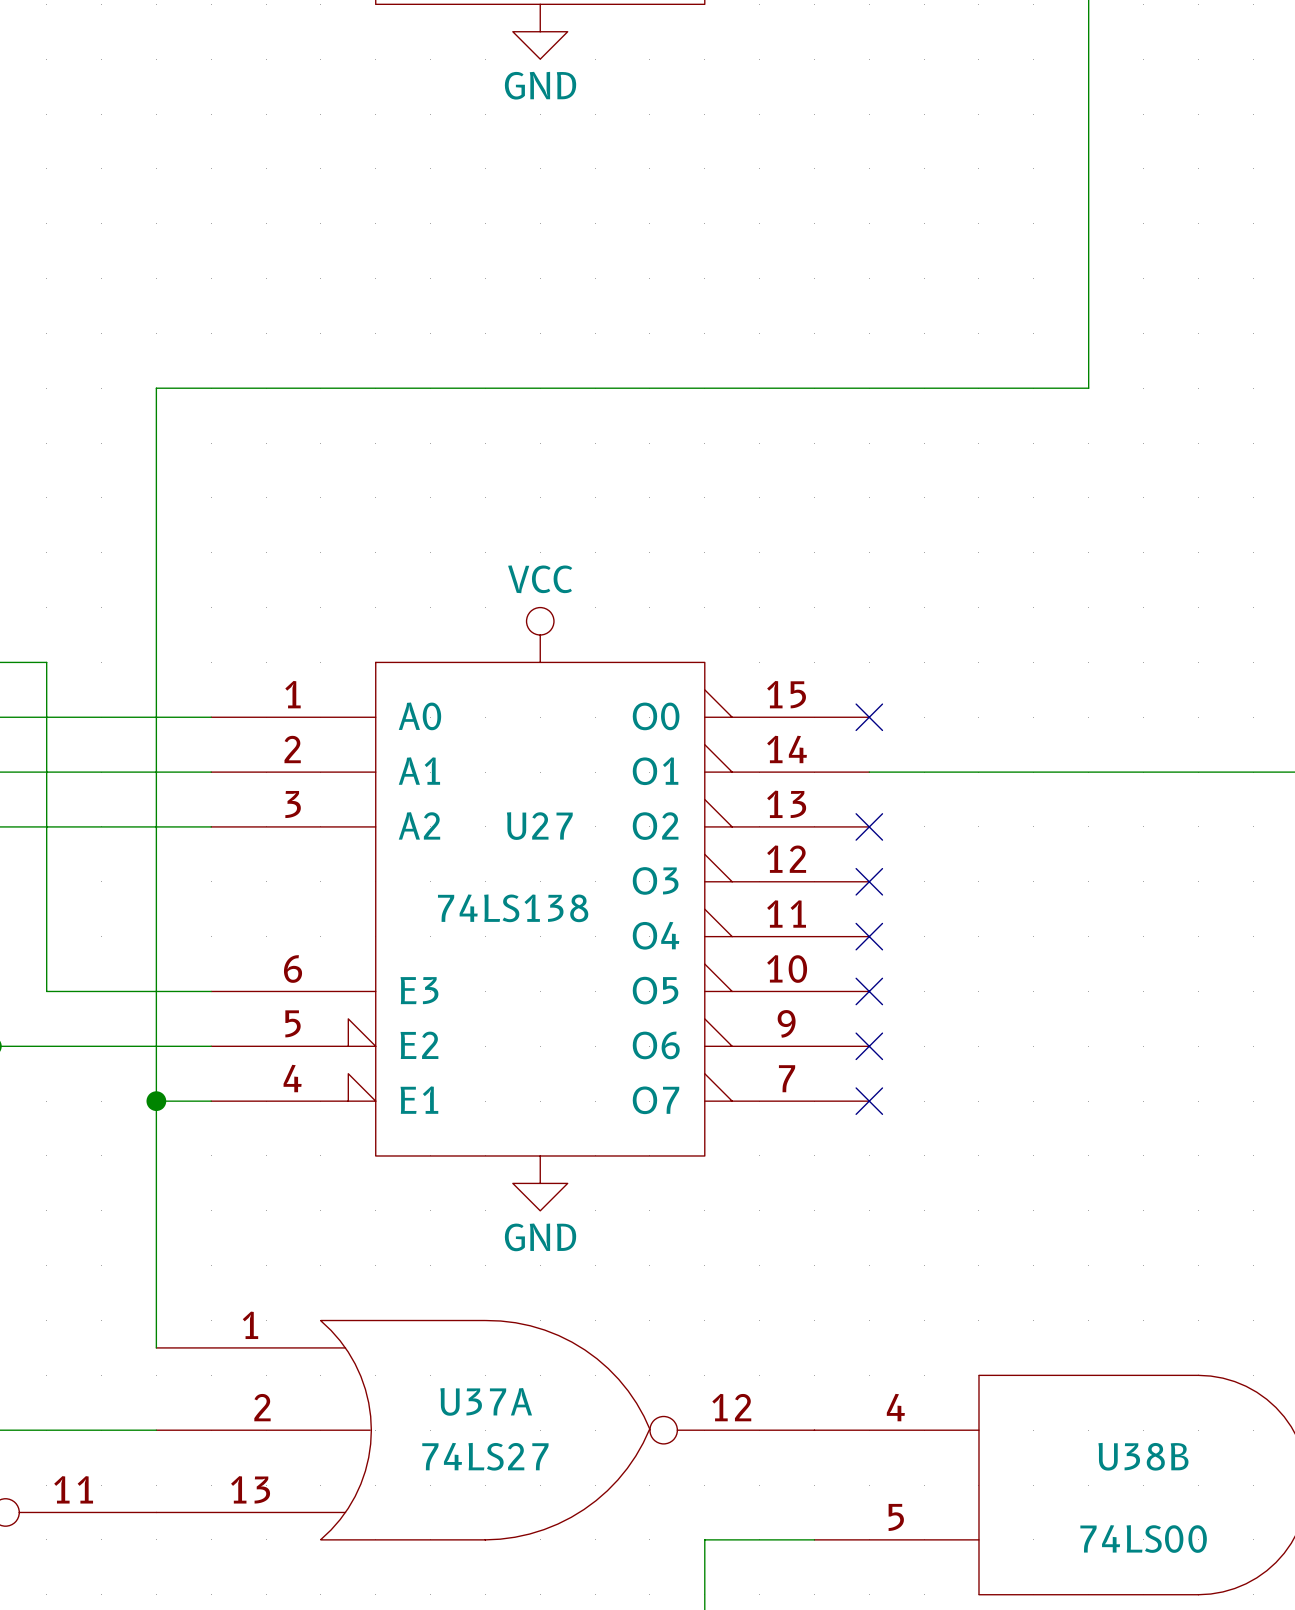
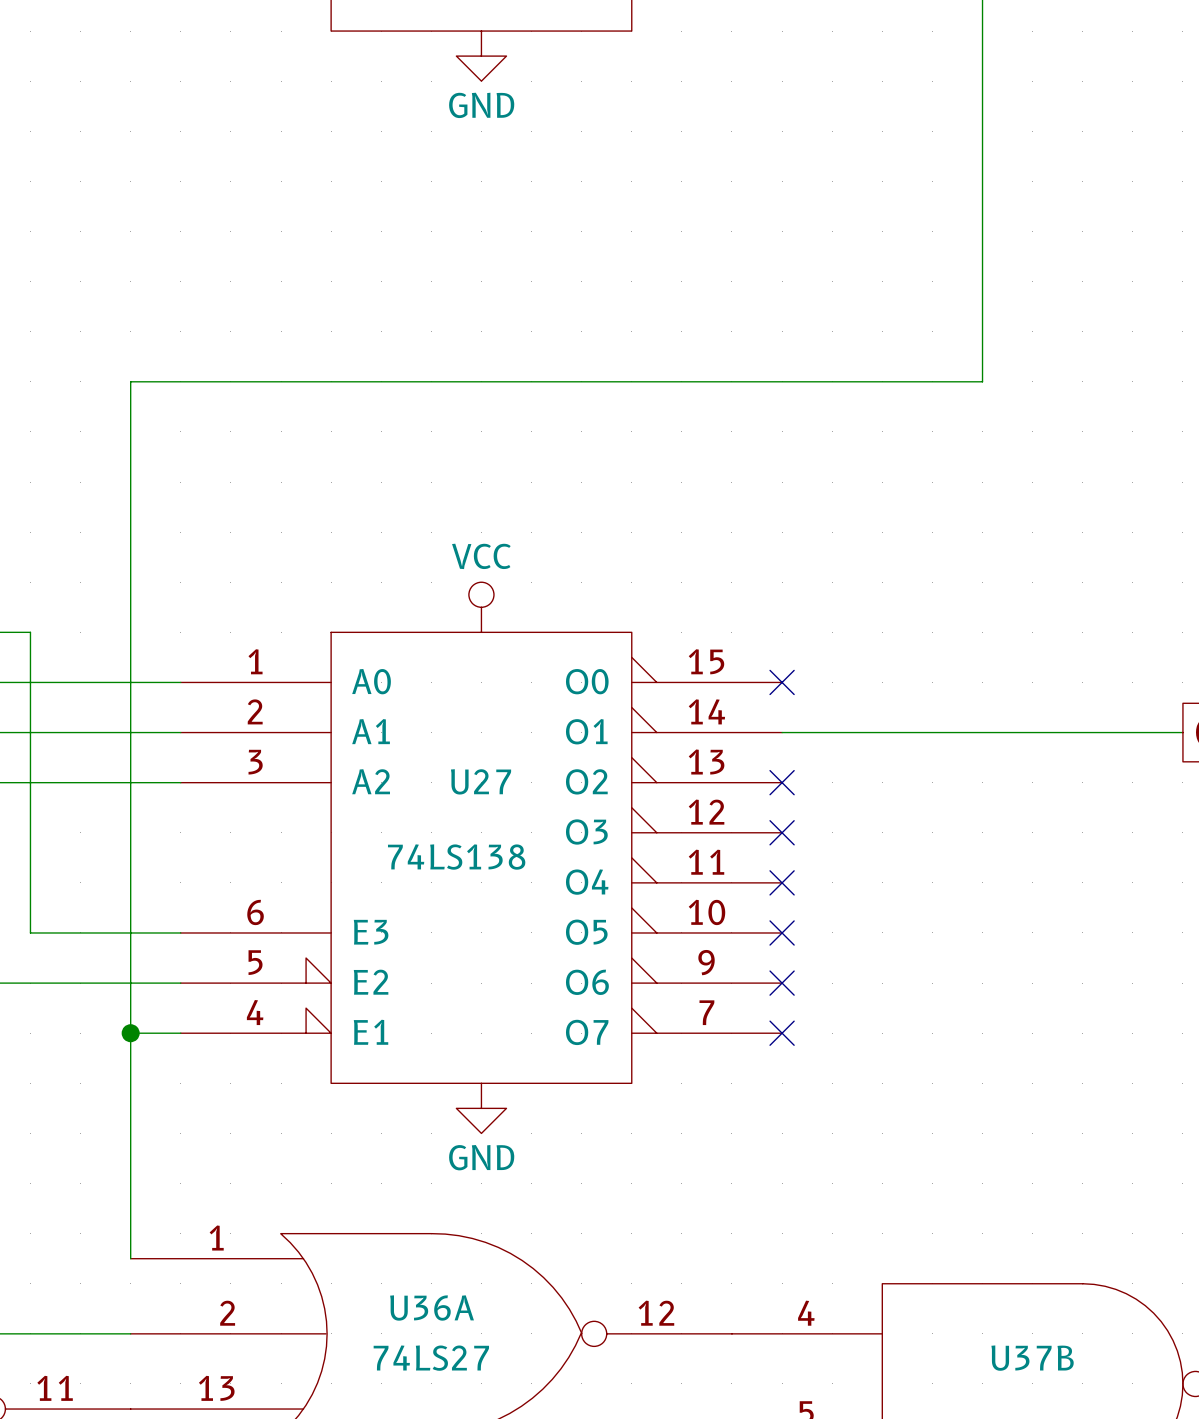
U37A name: U37A (486, 1401) -> U36A (432, 1308)
U38B name: U38B (1143, 1456) -> U37B (1032, 1358)

